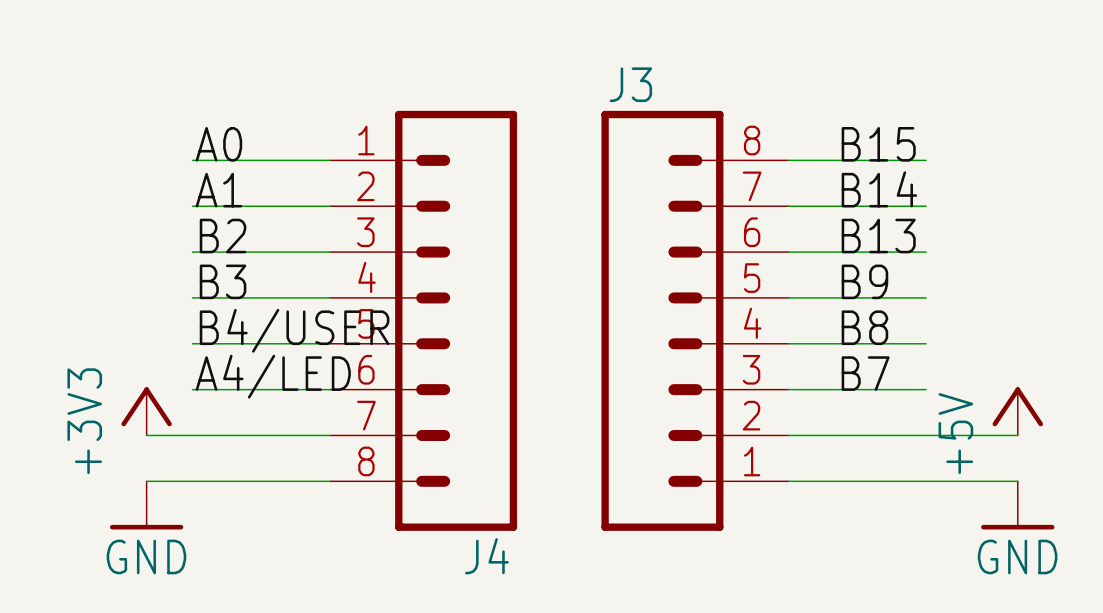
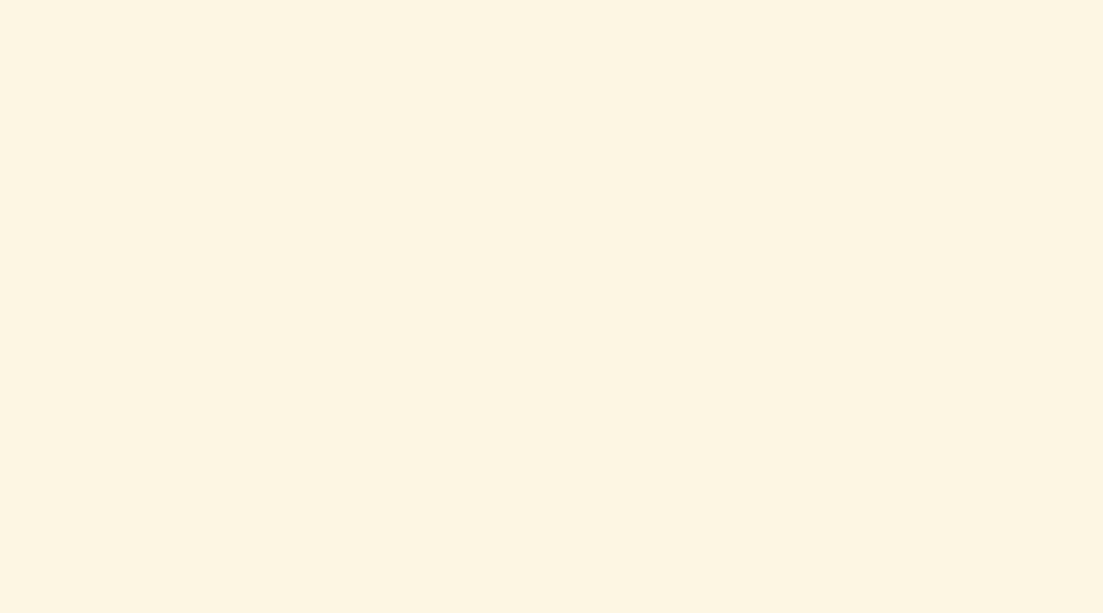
label: A0 (218, 144) -> none
label: B15 (878, 144) -> none
wire: (192, 160) (330, 160) -> none
wire: (788, 160) (926, 160) -> none
label: B14 (879, 189) -> none
label: A1 (218, 190) -> none
wire: (192, 206) (330, 206) -> none
wire: (788, 206) (926, 206) -> none
label: B2 (223, 236) -> none
label: B13 (878, 236) -> none
wire: (192, 252) (330, 252) -> none
wire: (788, 252) (926, 252) -> none
label: B3 (223, 281) -> none
label: B9 (864, 281) -> none
wire: (192, 297) (330, 297) -> none
wire: (788, 297) (926, 297) -> none
J4: (423, 320) -> none
J3: (694, 320) -> none
label: B8 (864, 327) -> none
label: B4/USER (294, 330) -> none
wire: (192, 343) (330, 343) -> none
wire: (788, 343) (926, 343) -> none
label: B7 (865, 373) -> none
label: A4/LED (273, 376) -> none
wire: (192, 389) (330, 389) -> none
wire: (788, 389) (926, 389) -> none
power symbol: +3V3 (146, 411) -> none
power symbol: +5V (1017, 411) -> none
wire: (146, 435) (330, 435) -> none
wire: (788, 435) (1017, 435) -> none
wire: (146, 481) (330, 481) -> none
wire: (788, 481) (1017, 481) -> none
power symbol: GND (146, 505) -> none
power symbol: GND (1017, 505) -> none

